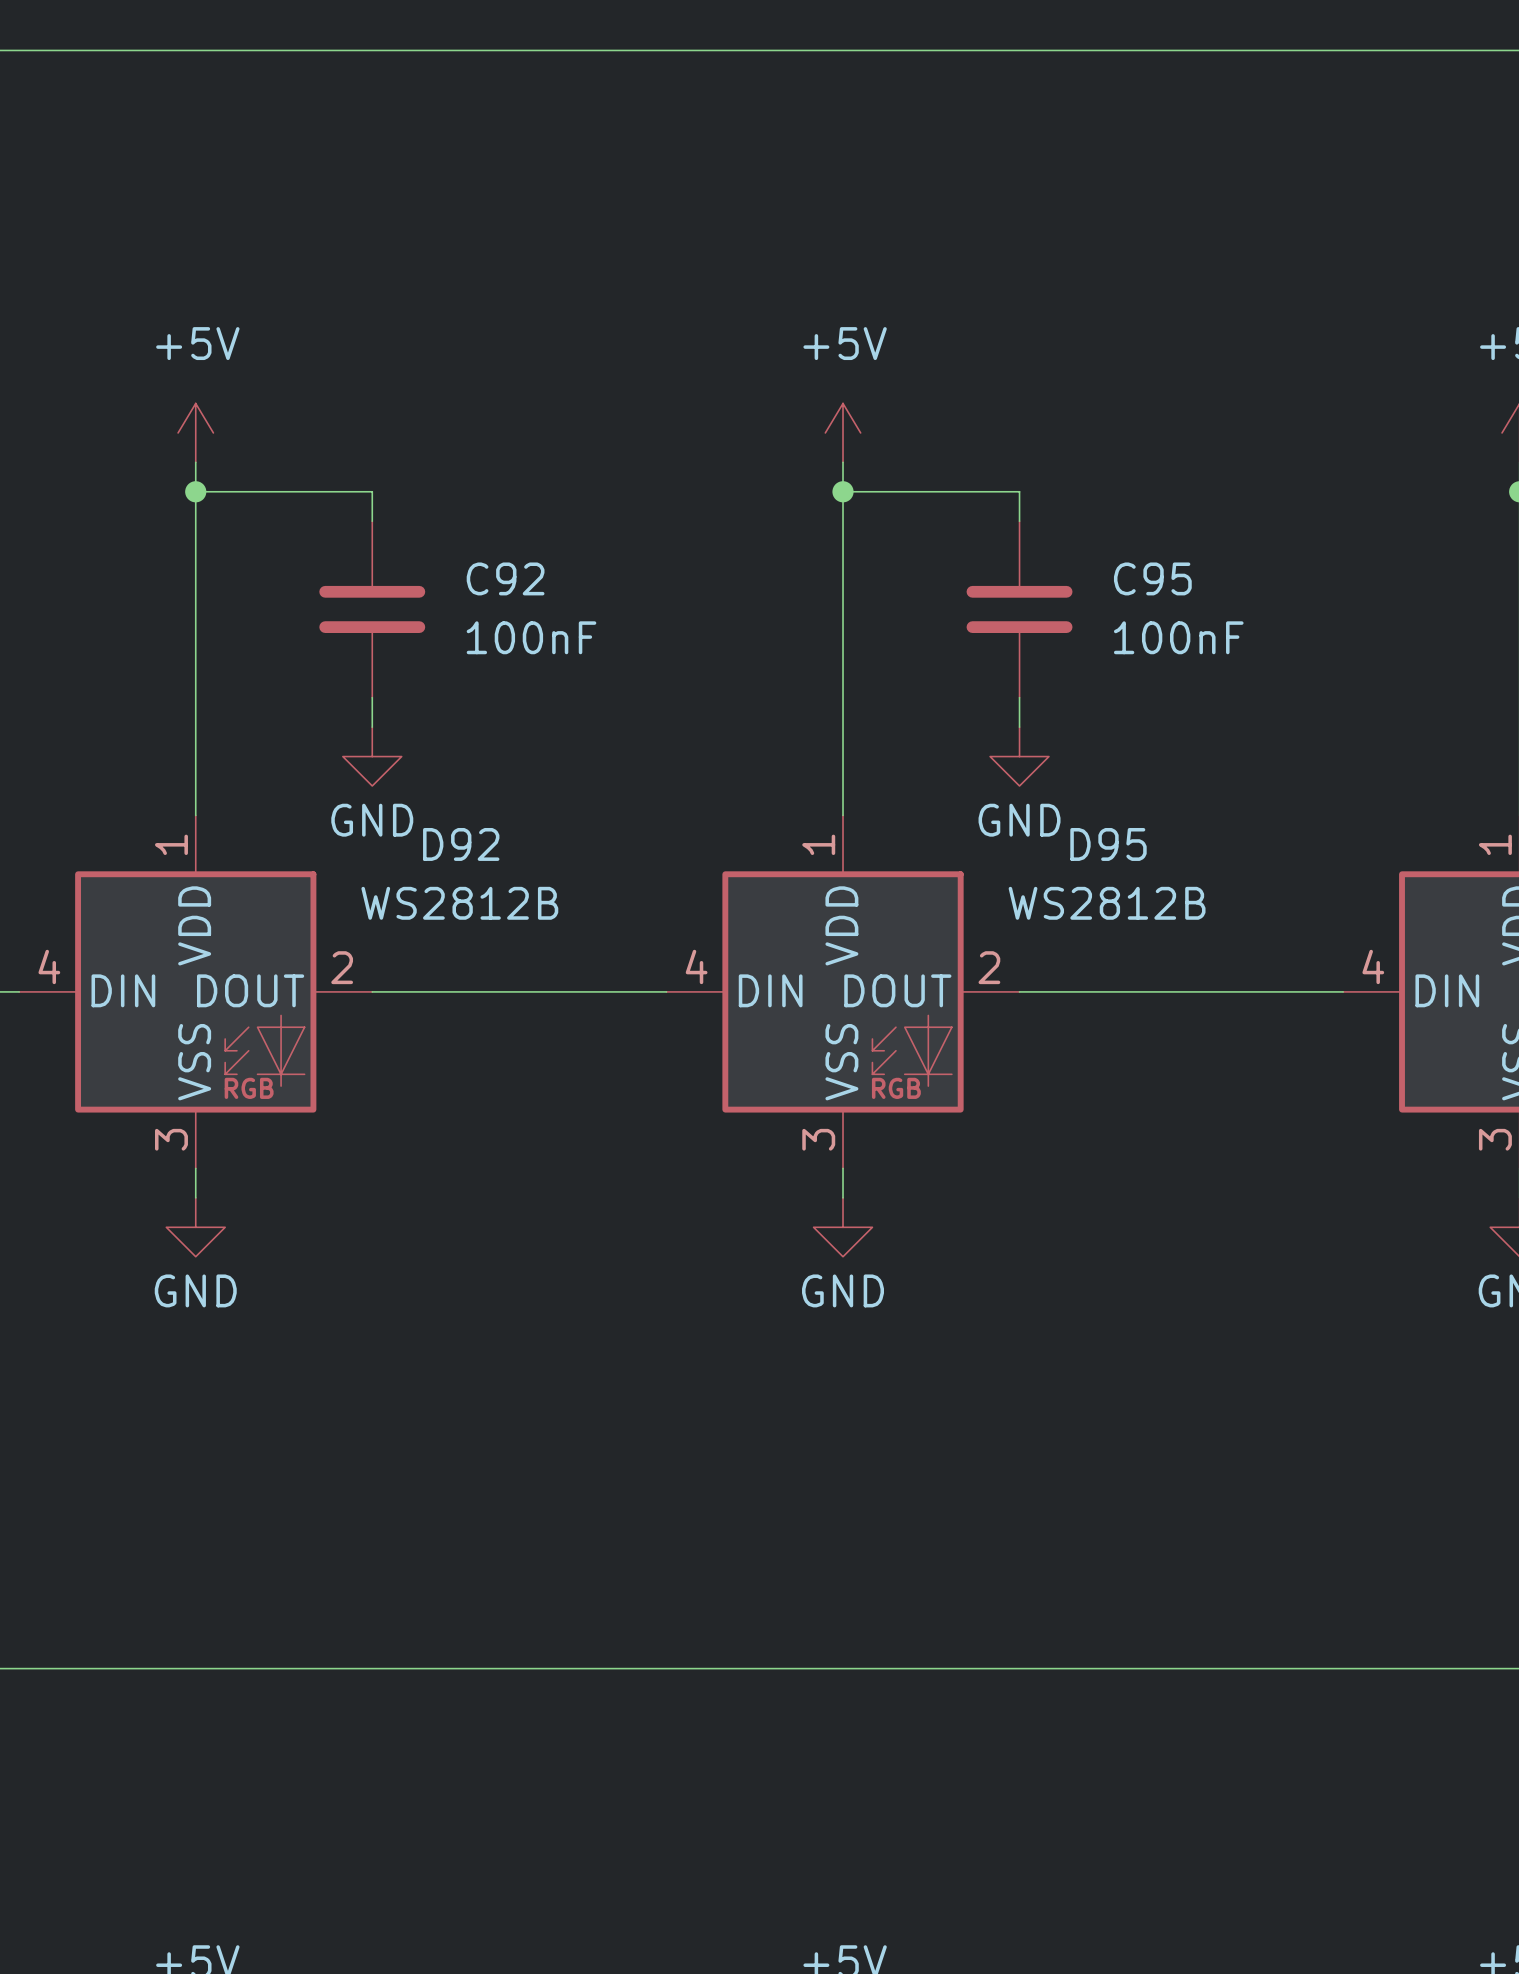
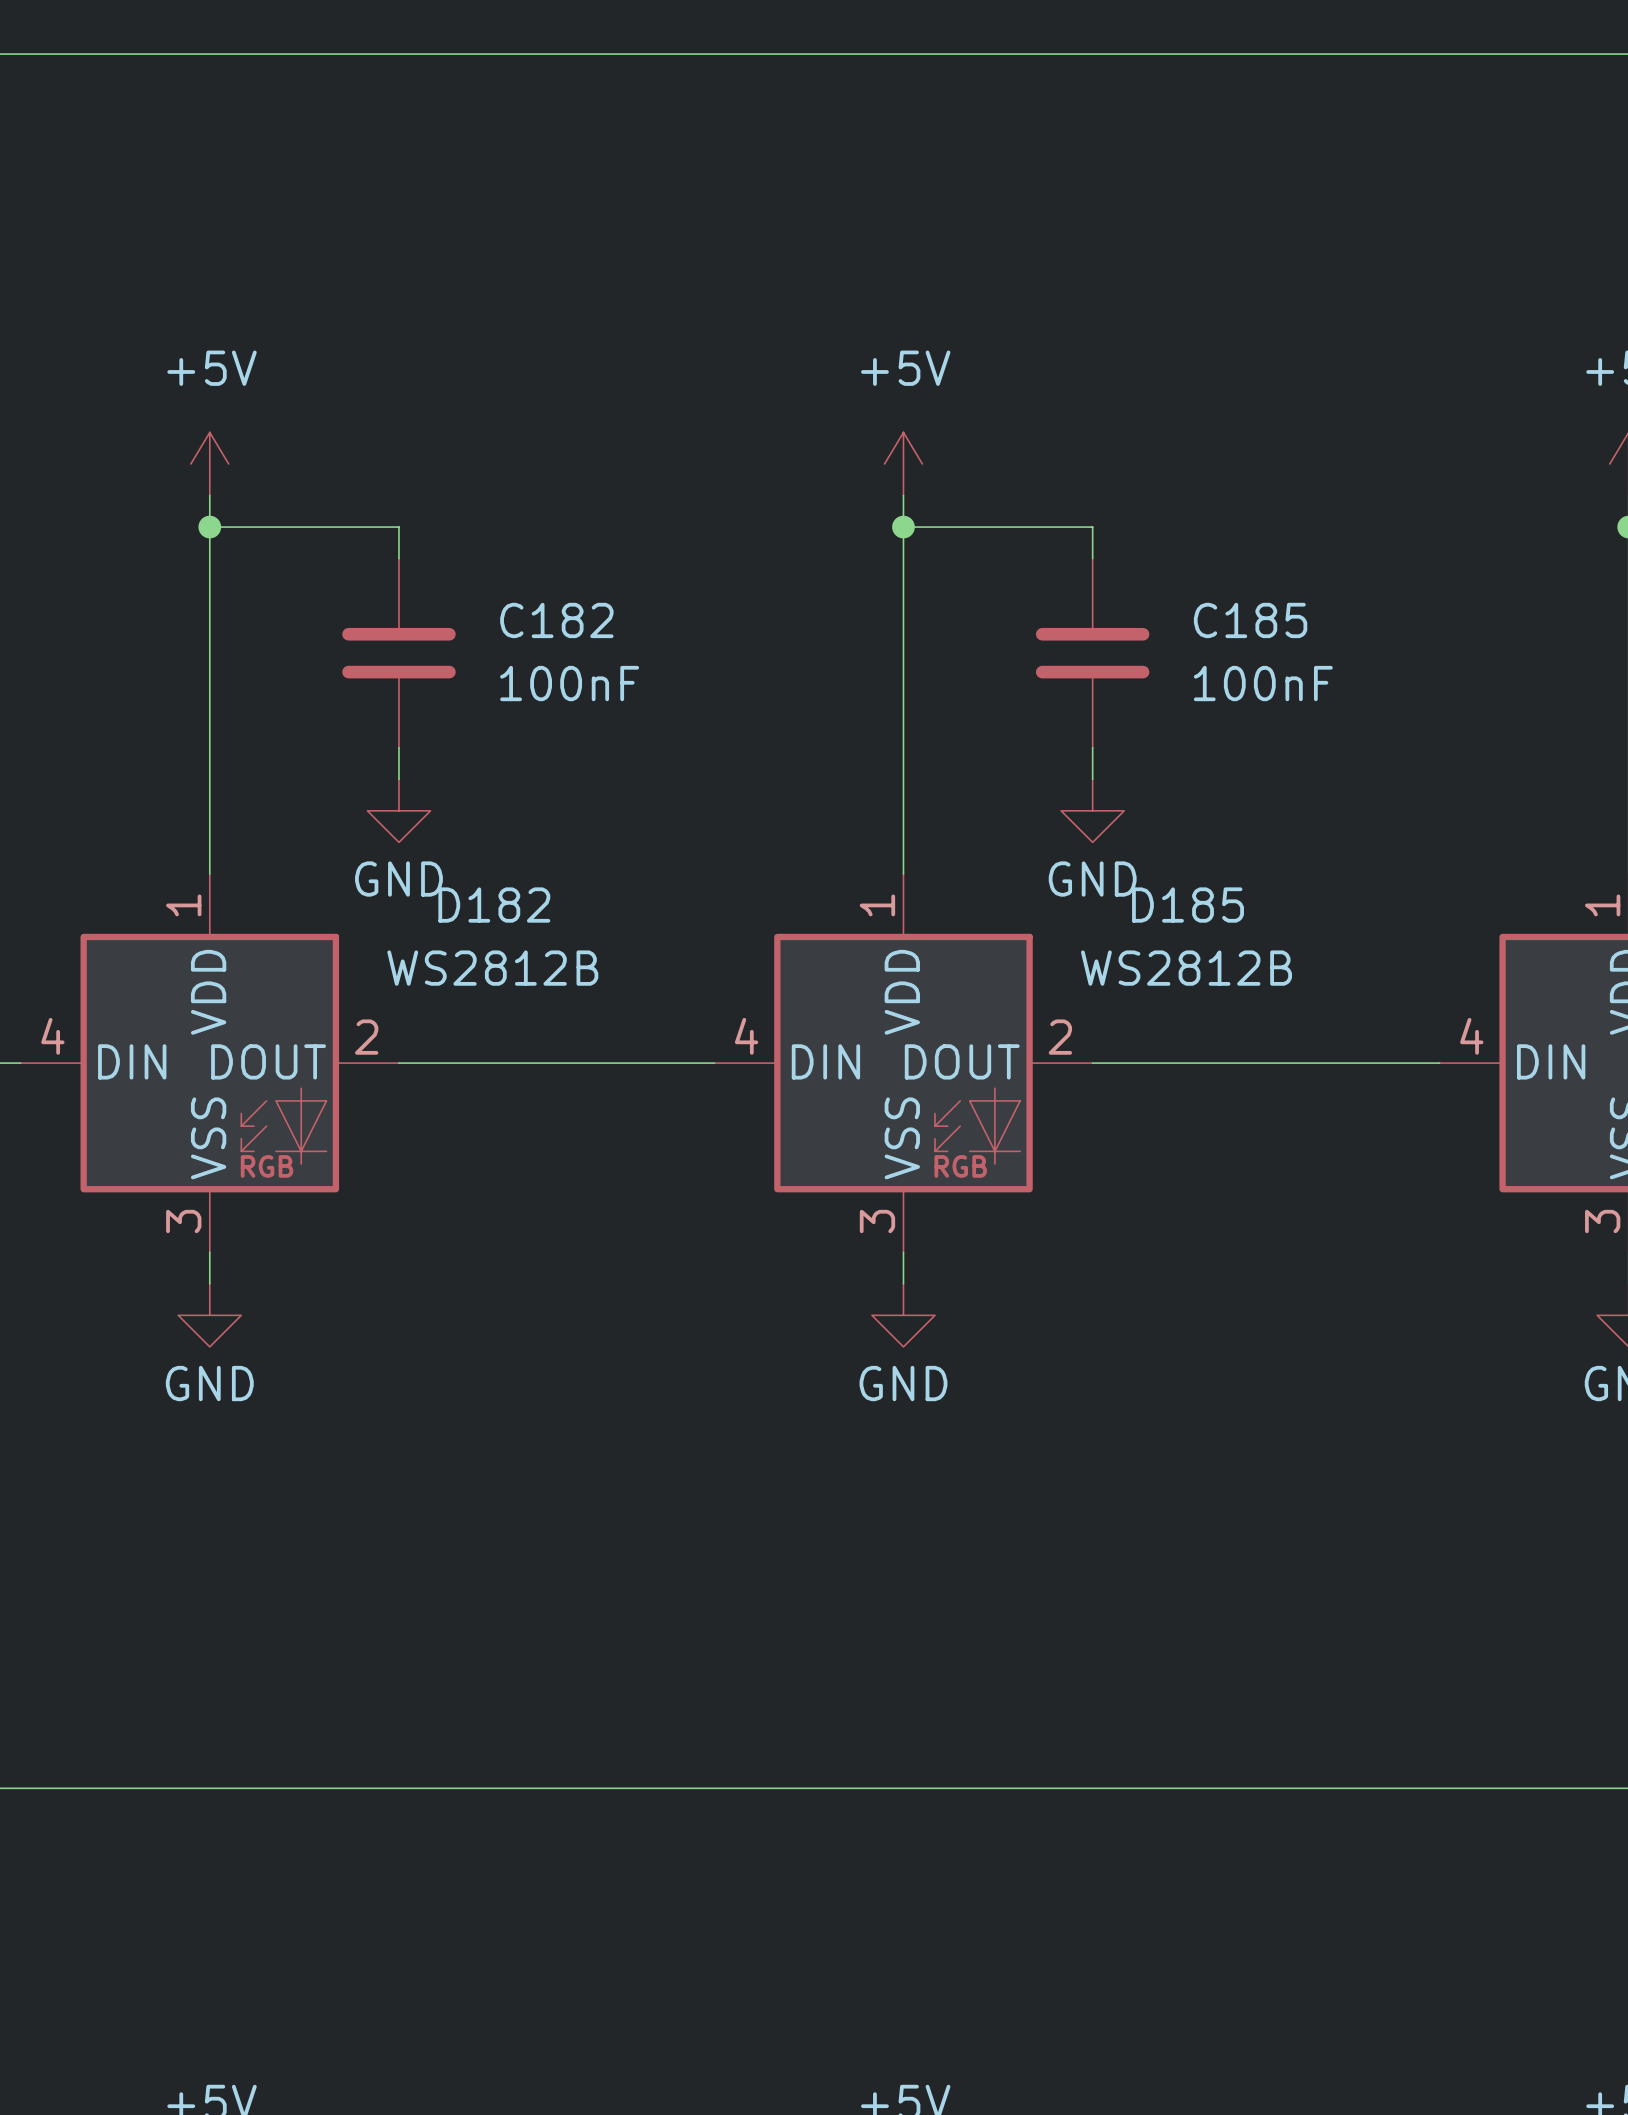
C92 name: C92 (505, 578) -> C182 (556, 620)
C95 name: C95 (1152, 578) -> C185 (1250, 620)
D92 name: D92 (461, 844) -> D182 (494, 905)
D95 name: D95 (1108, 844) -> D185 (1188, 905)

